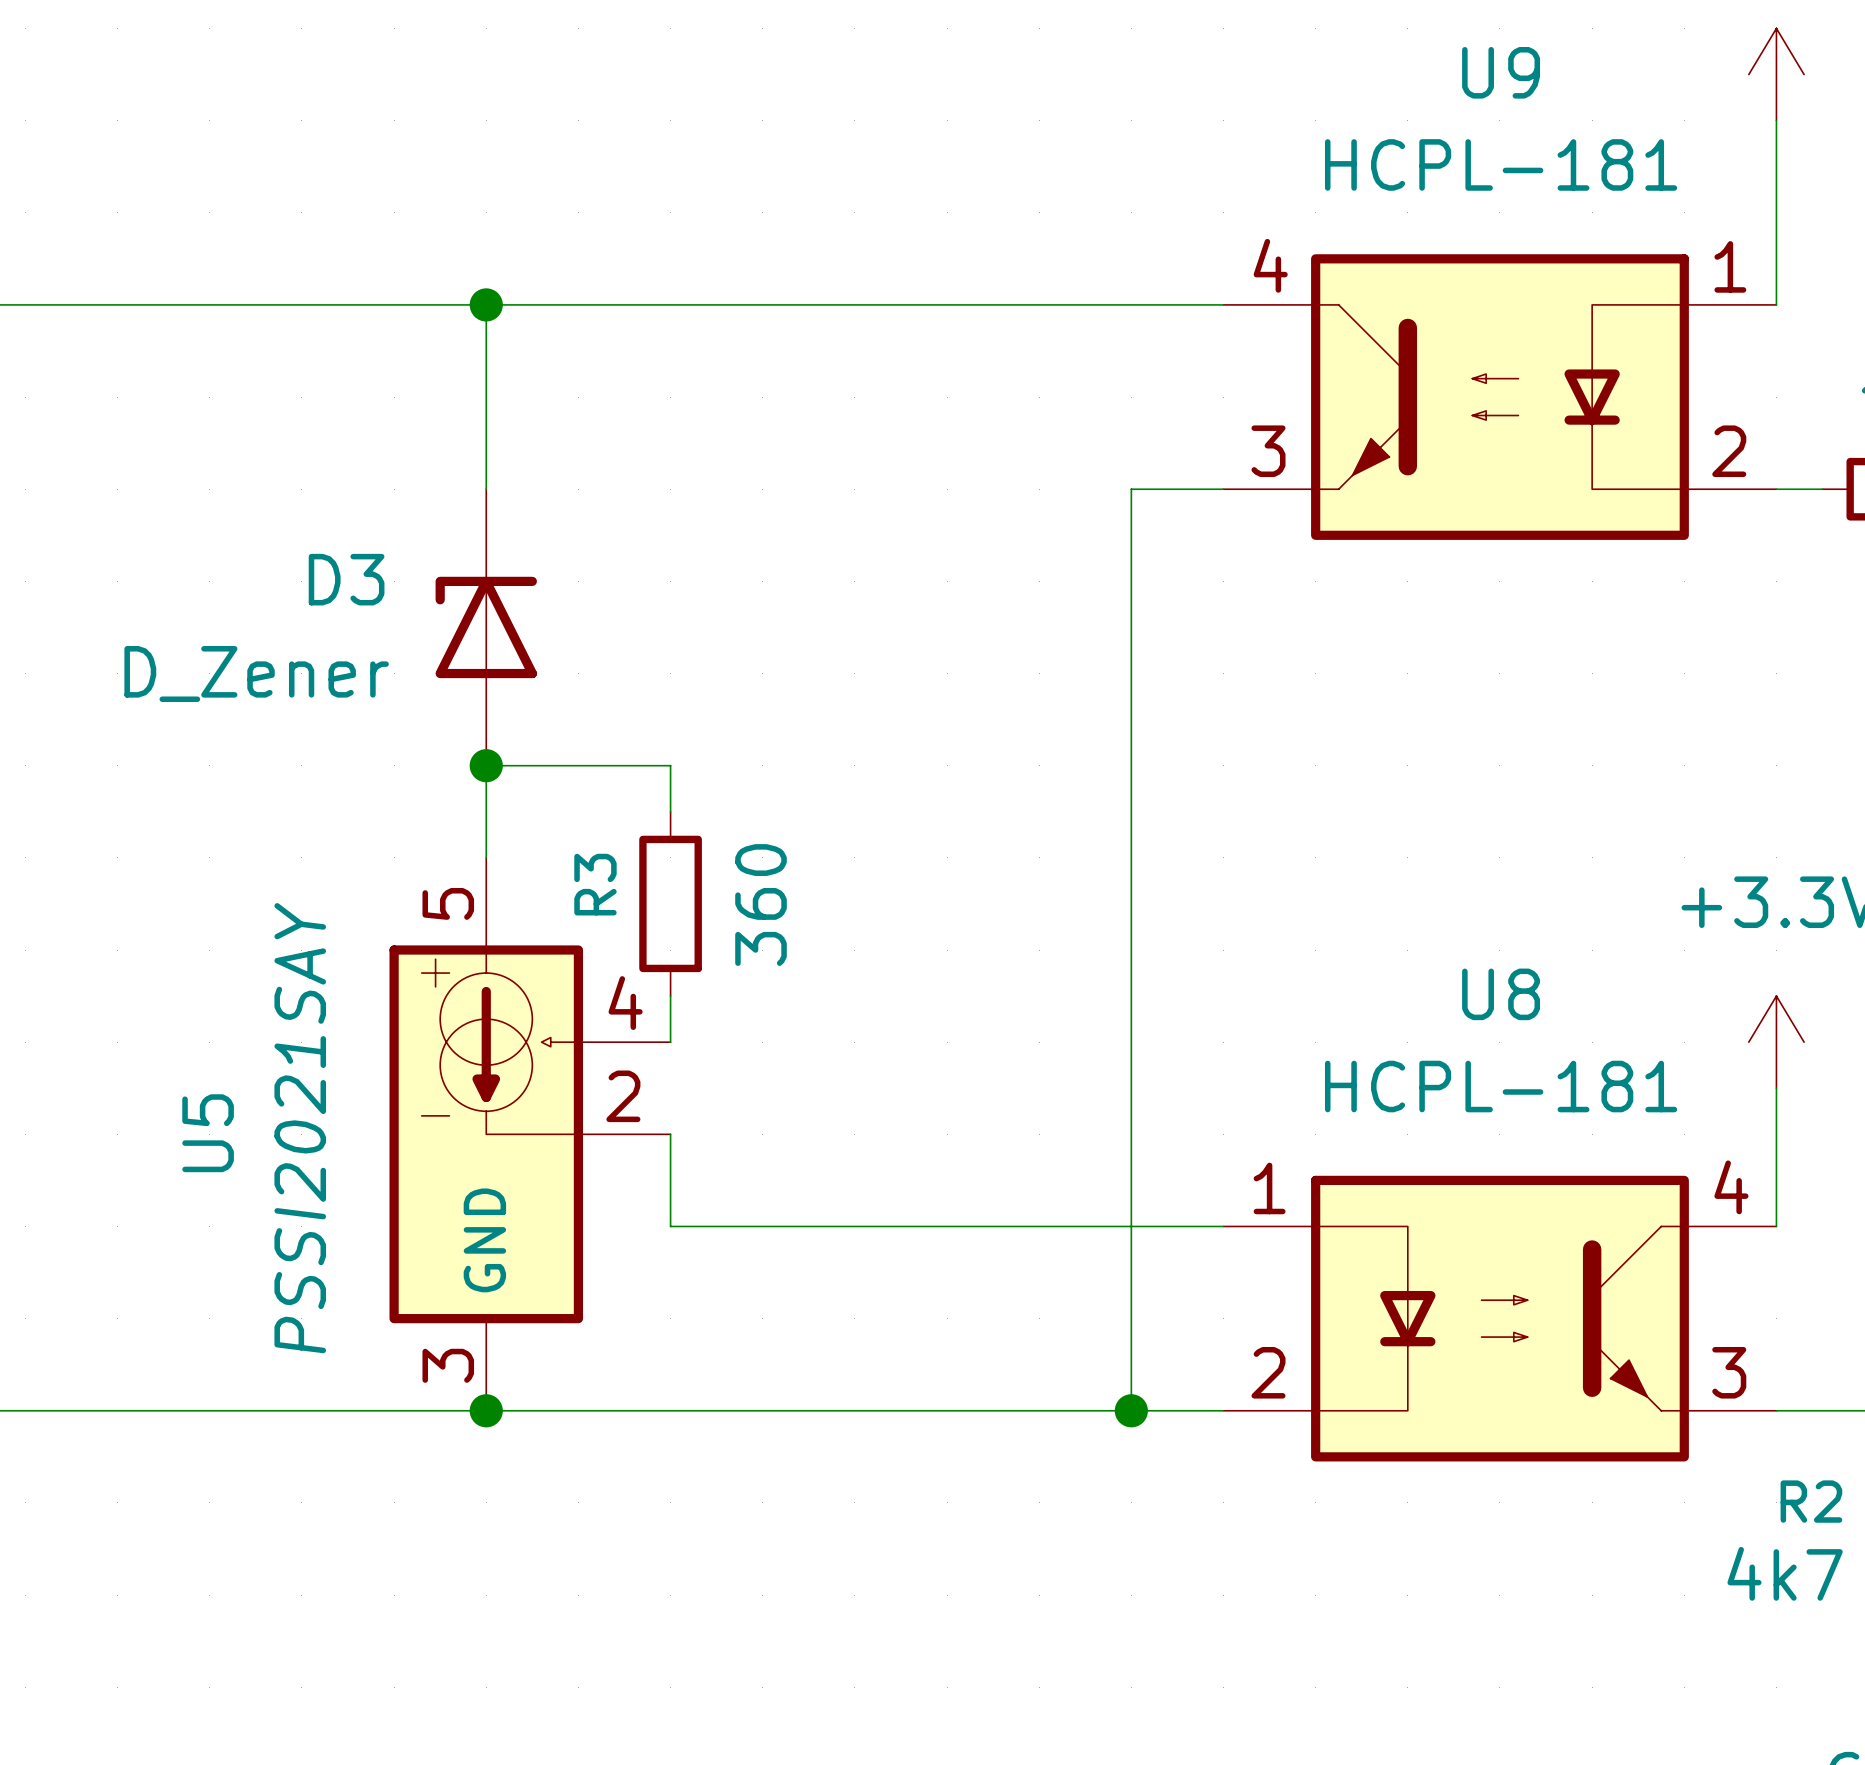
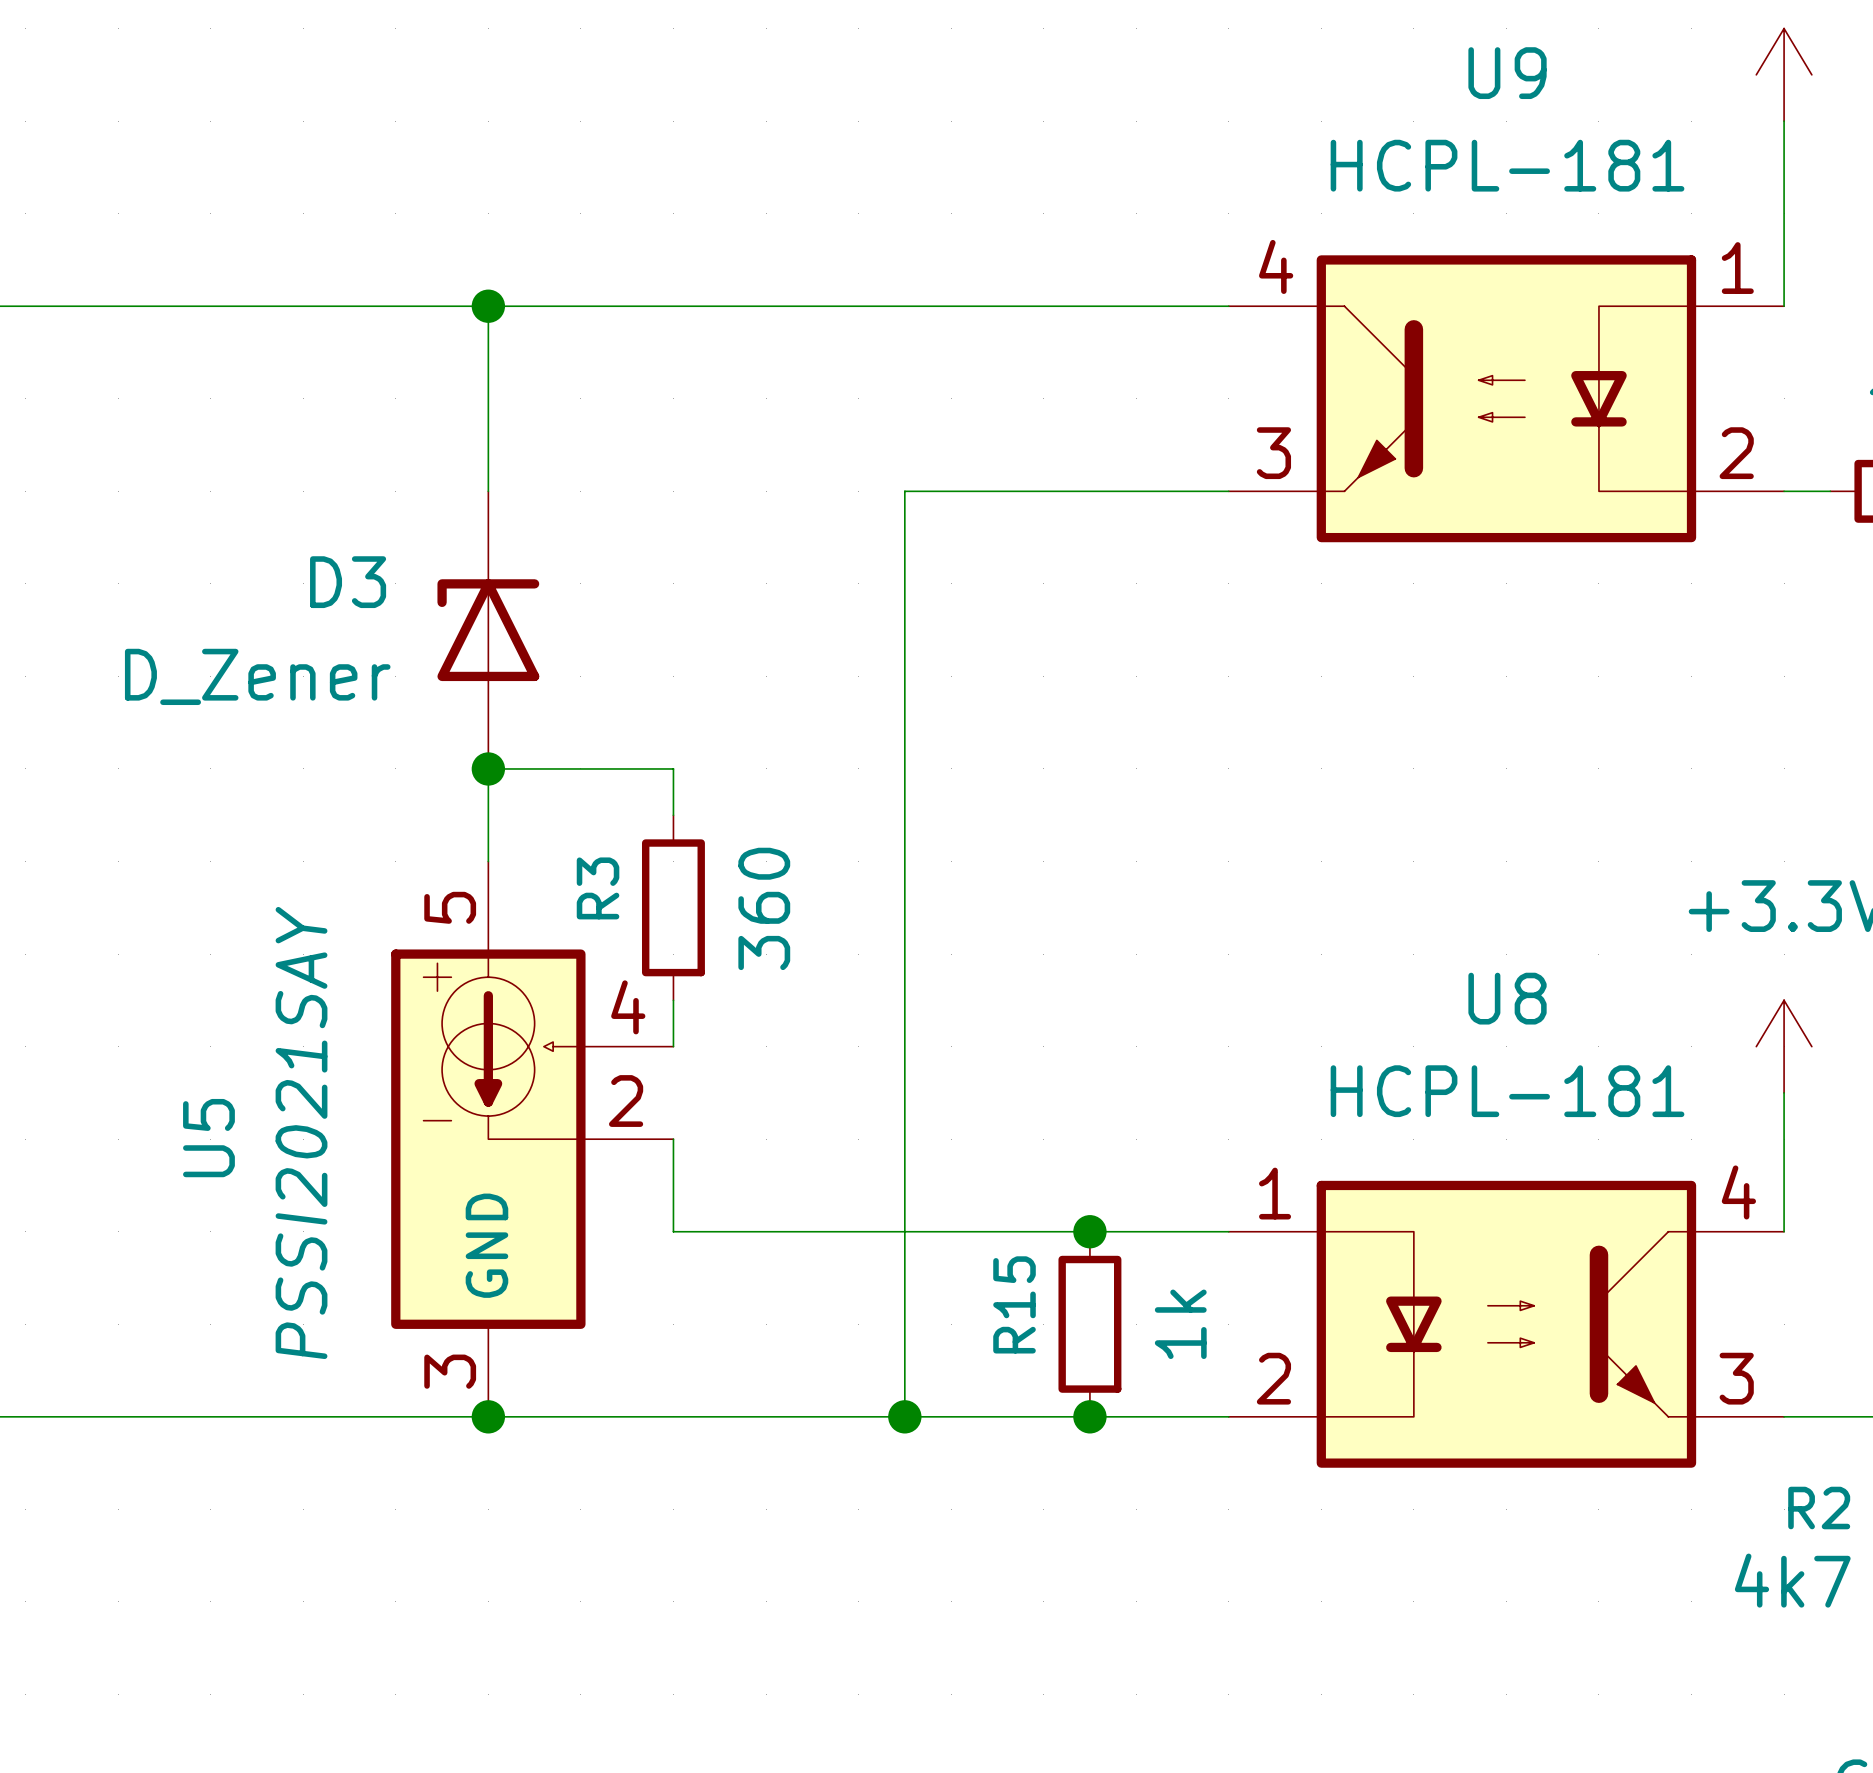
wire: (1131, 489) (1131, 1410) -> (1136, 491) (904, 491) (904, 1416)
junction: none -> (1089, 1231)
R15: none -> 1k (1089, 1324)
junction: none -> (904, 1416)
junction position: (1131, 1410) -> (1089, 1416)

